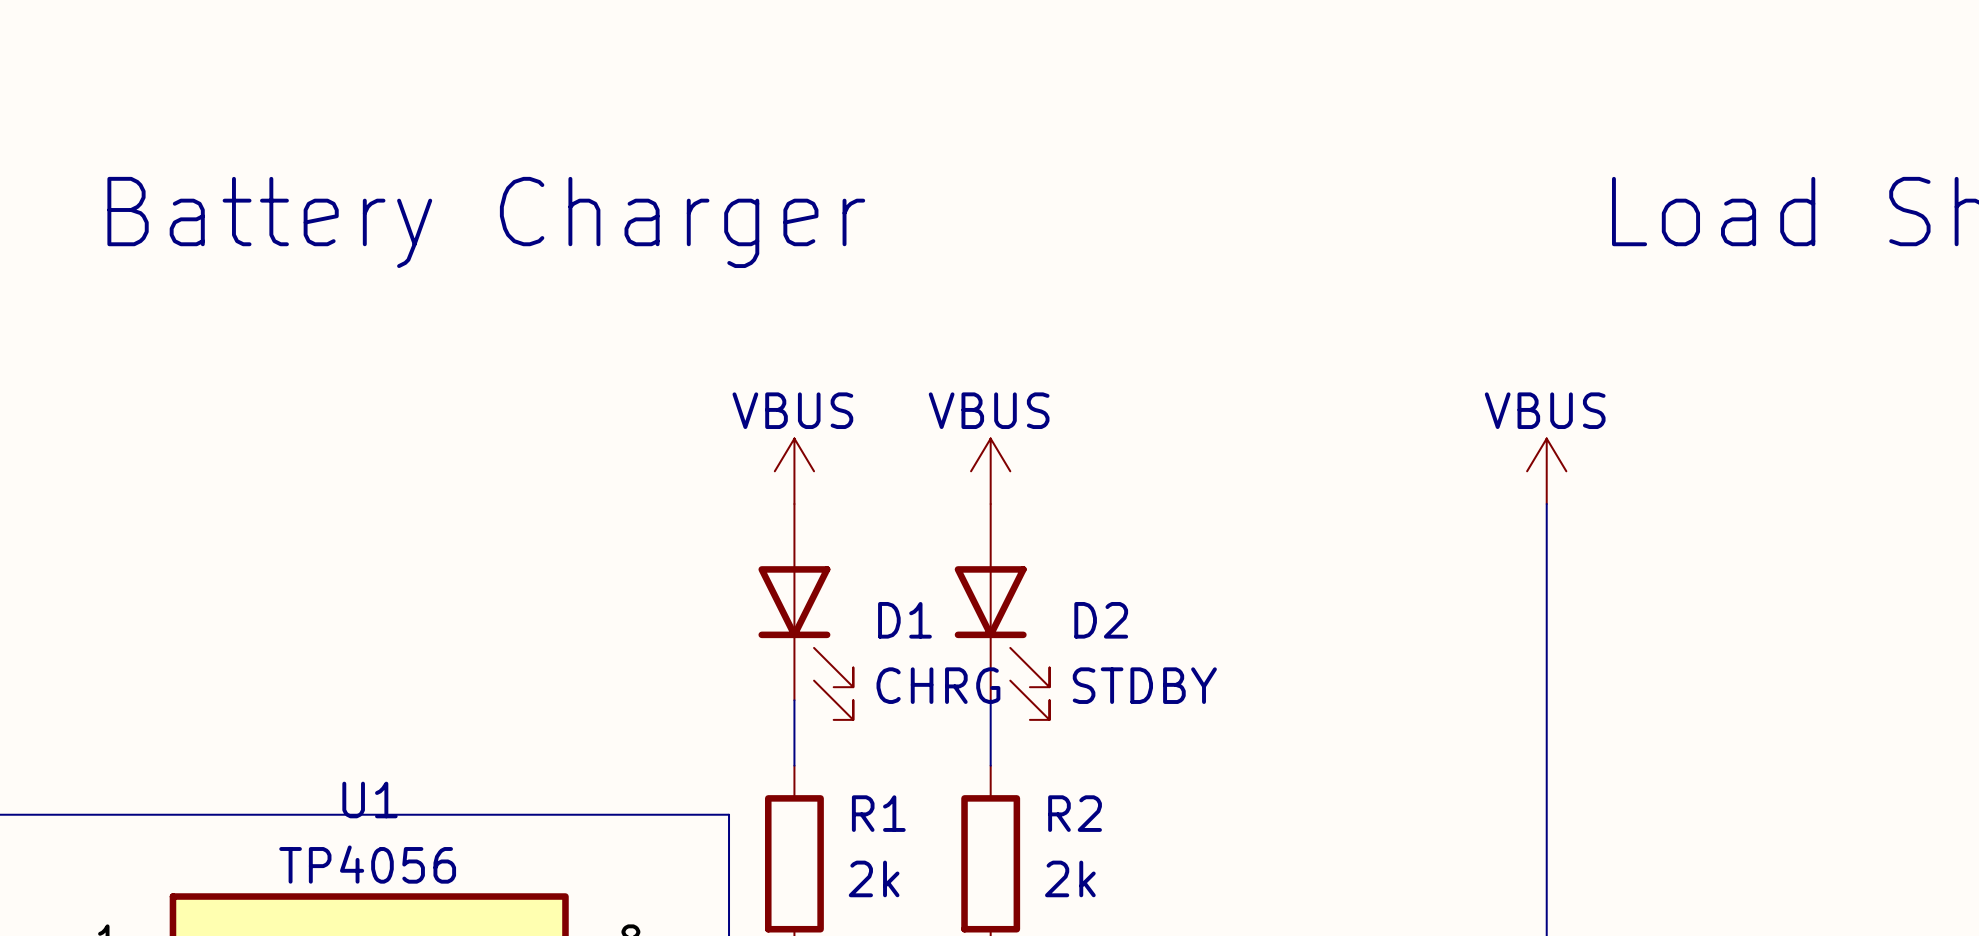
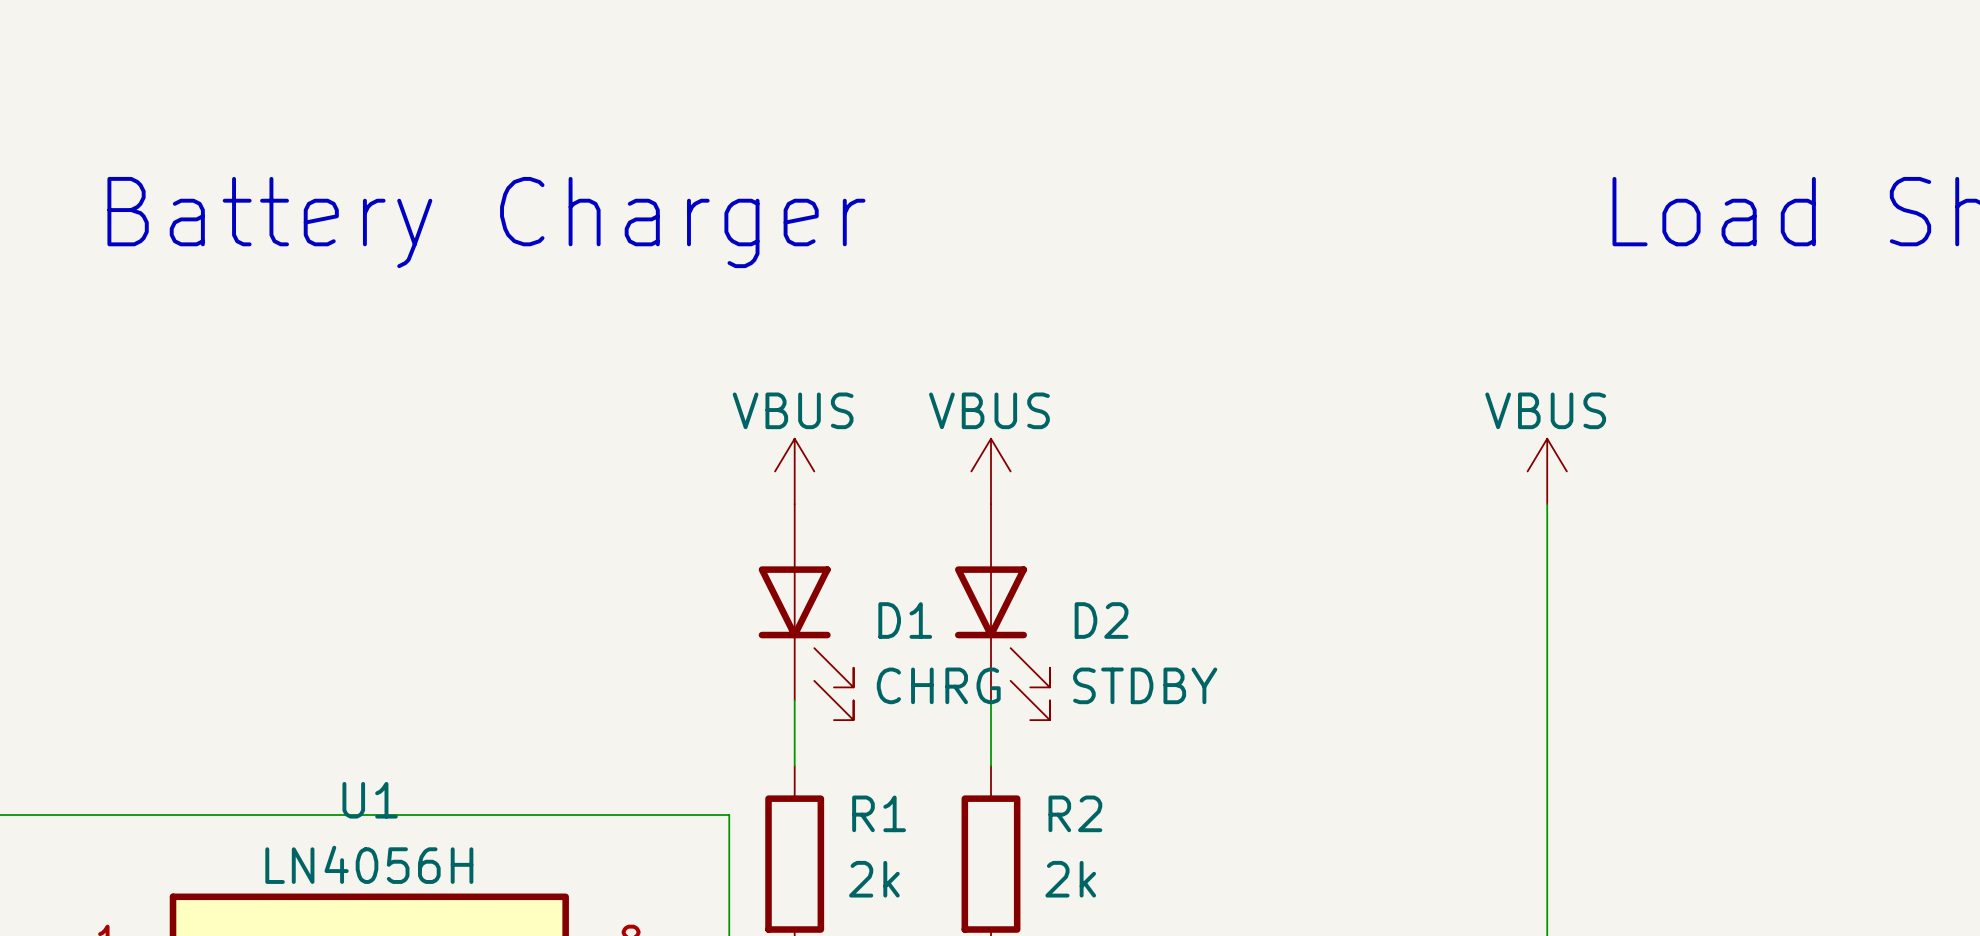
U1 value: TP4056 (367, 864) -> LN4056H (369, 864)

